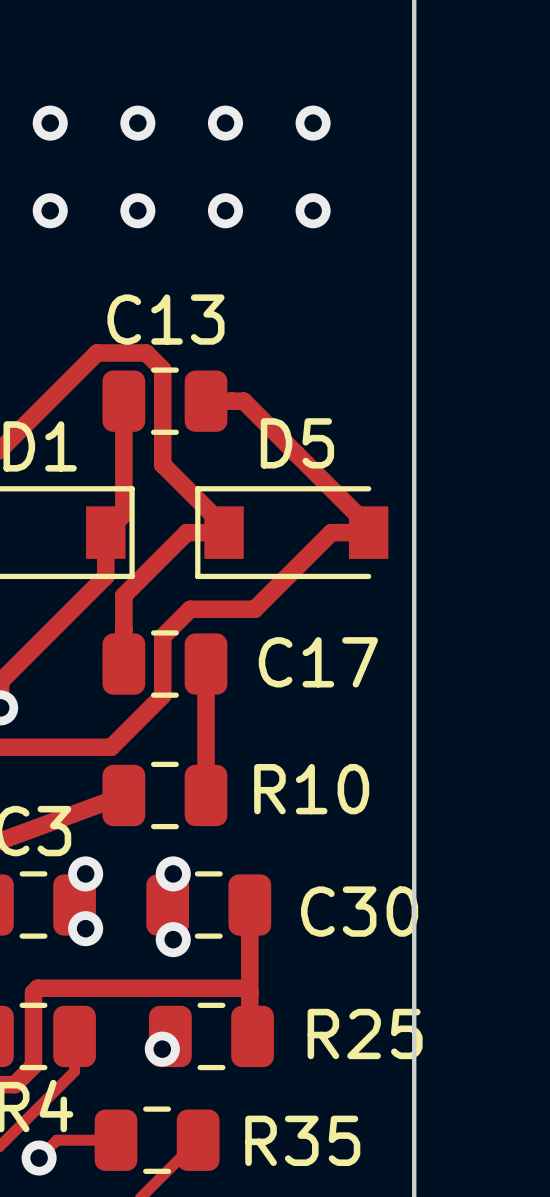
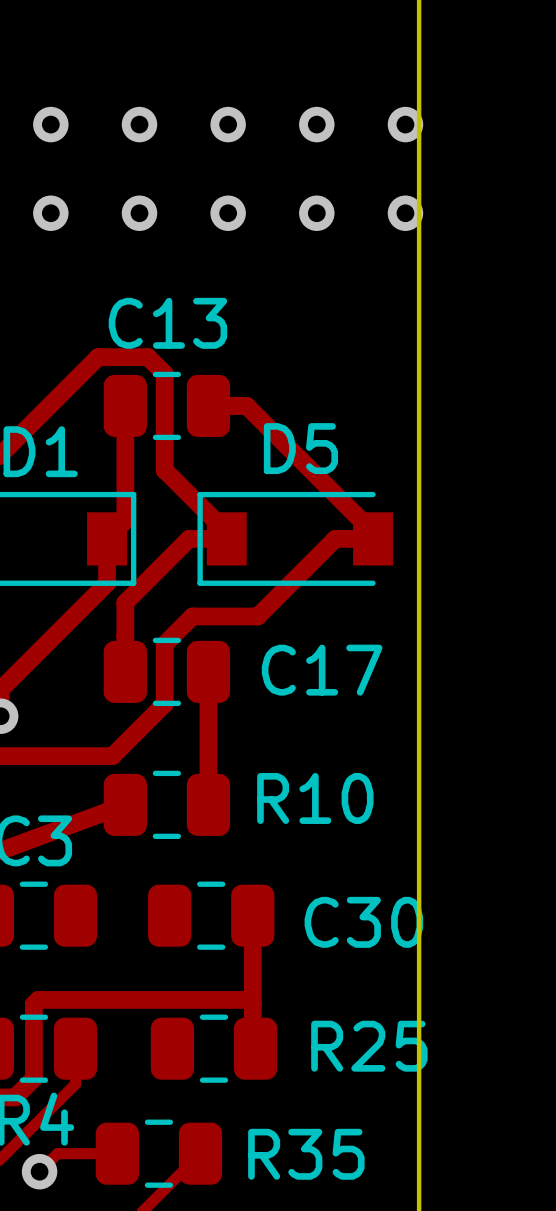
via: none -> (405, 124)
via: none -> (405, 213)
via: (85, 873) -> none
via: (173, 873) -> none
via: (85, 928) -> none
via: (173, 939) -> none
via: (162, 1049) -> none

